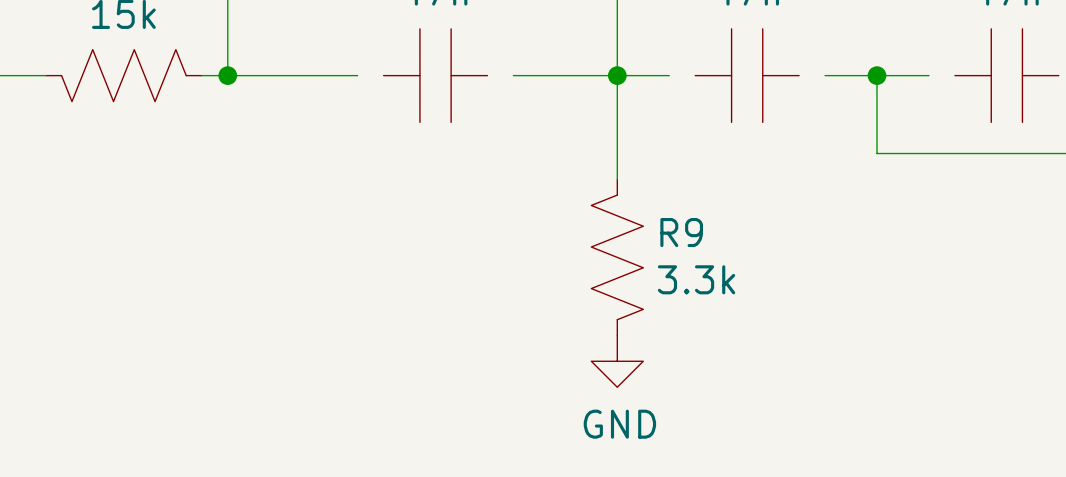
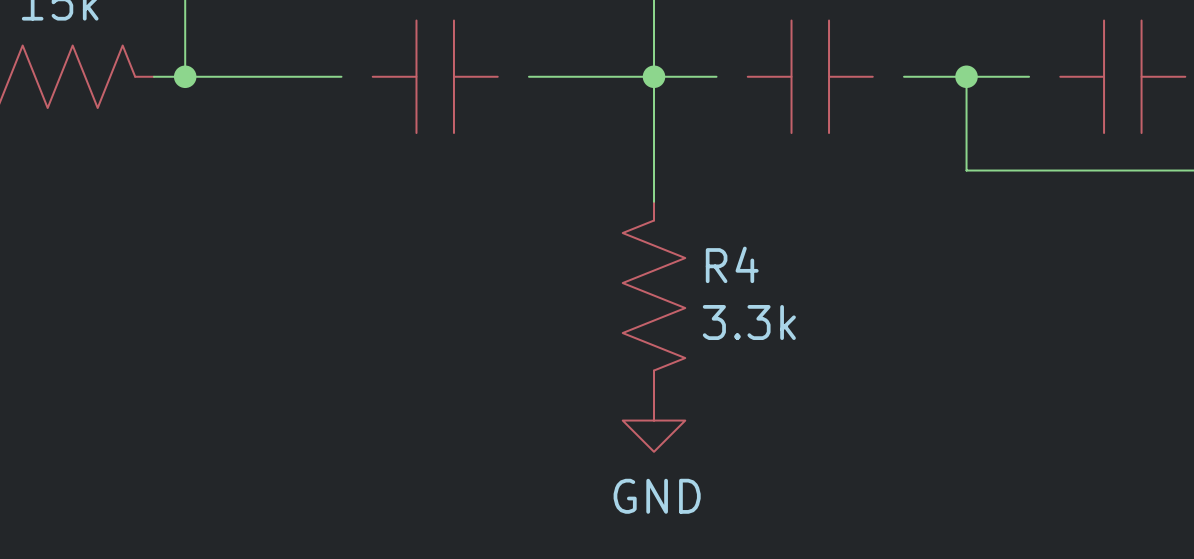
R9 name: R9 (681, 232) -> R4 (732, 264)

